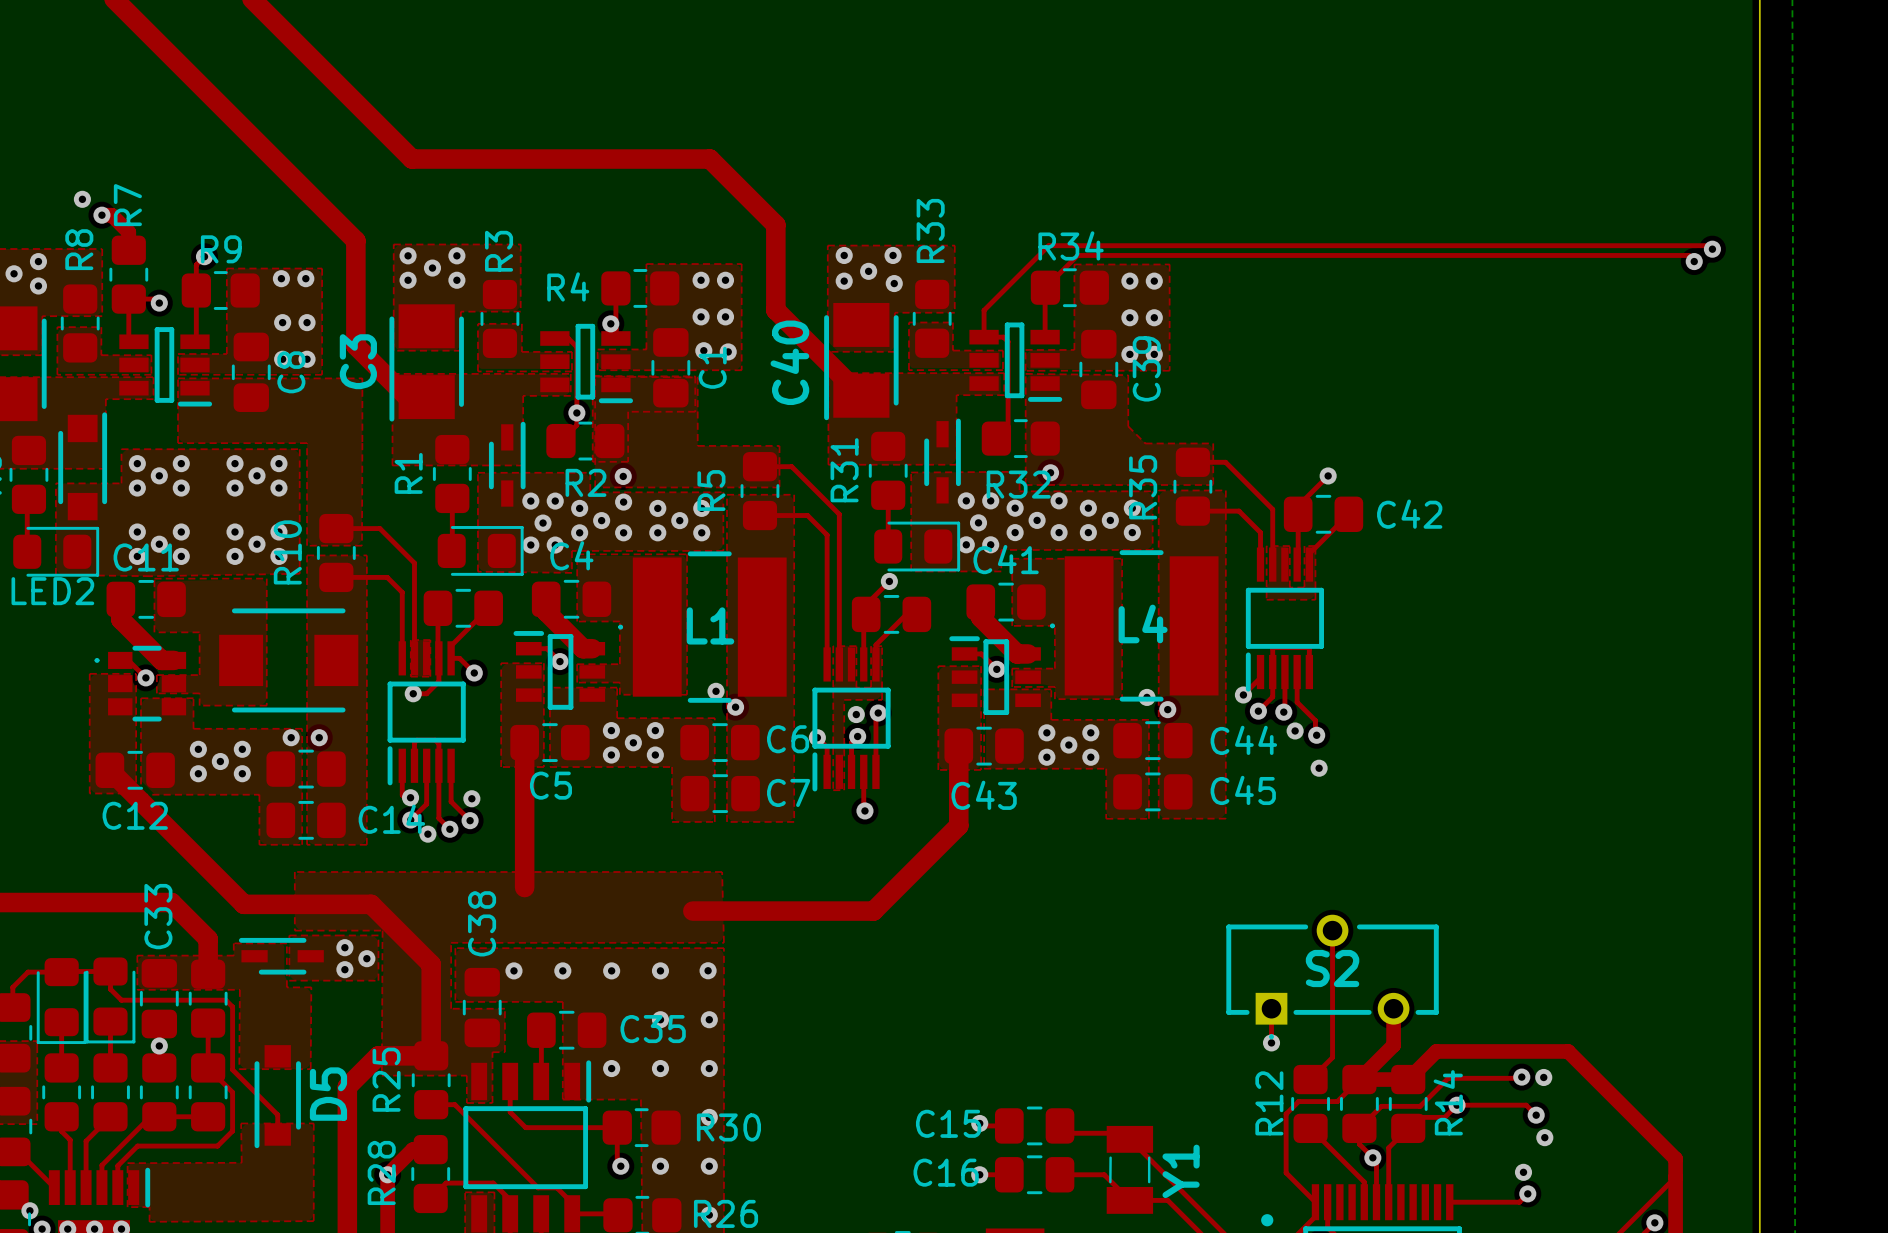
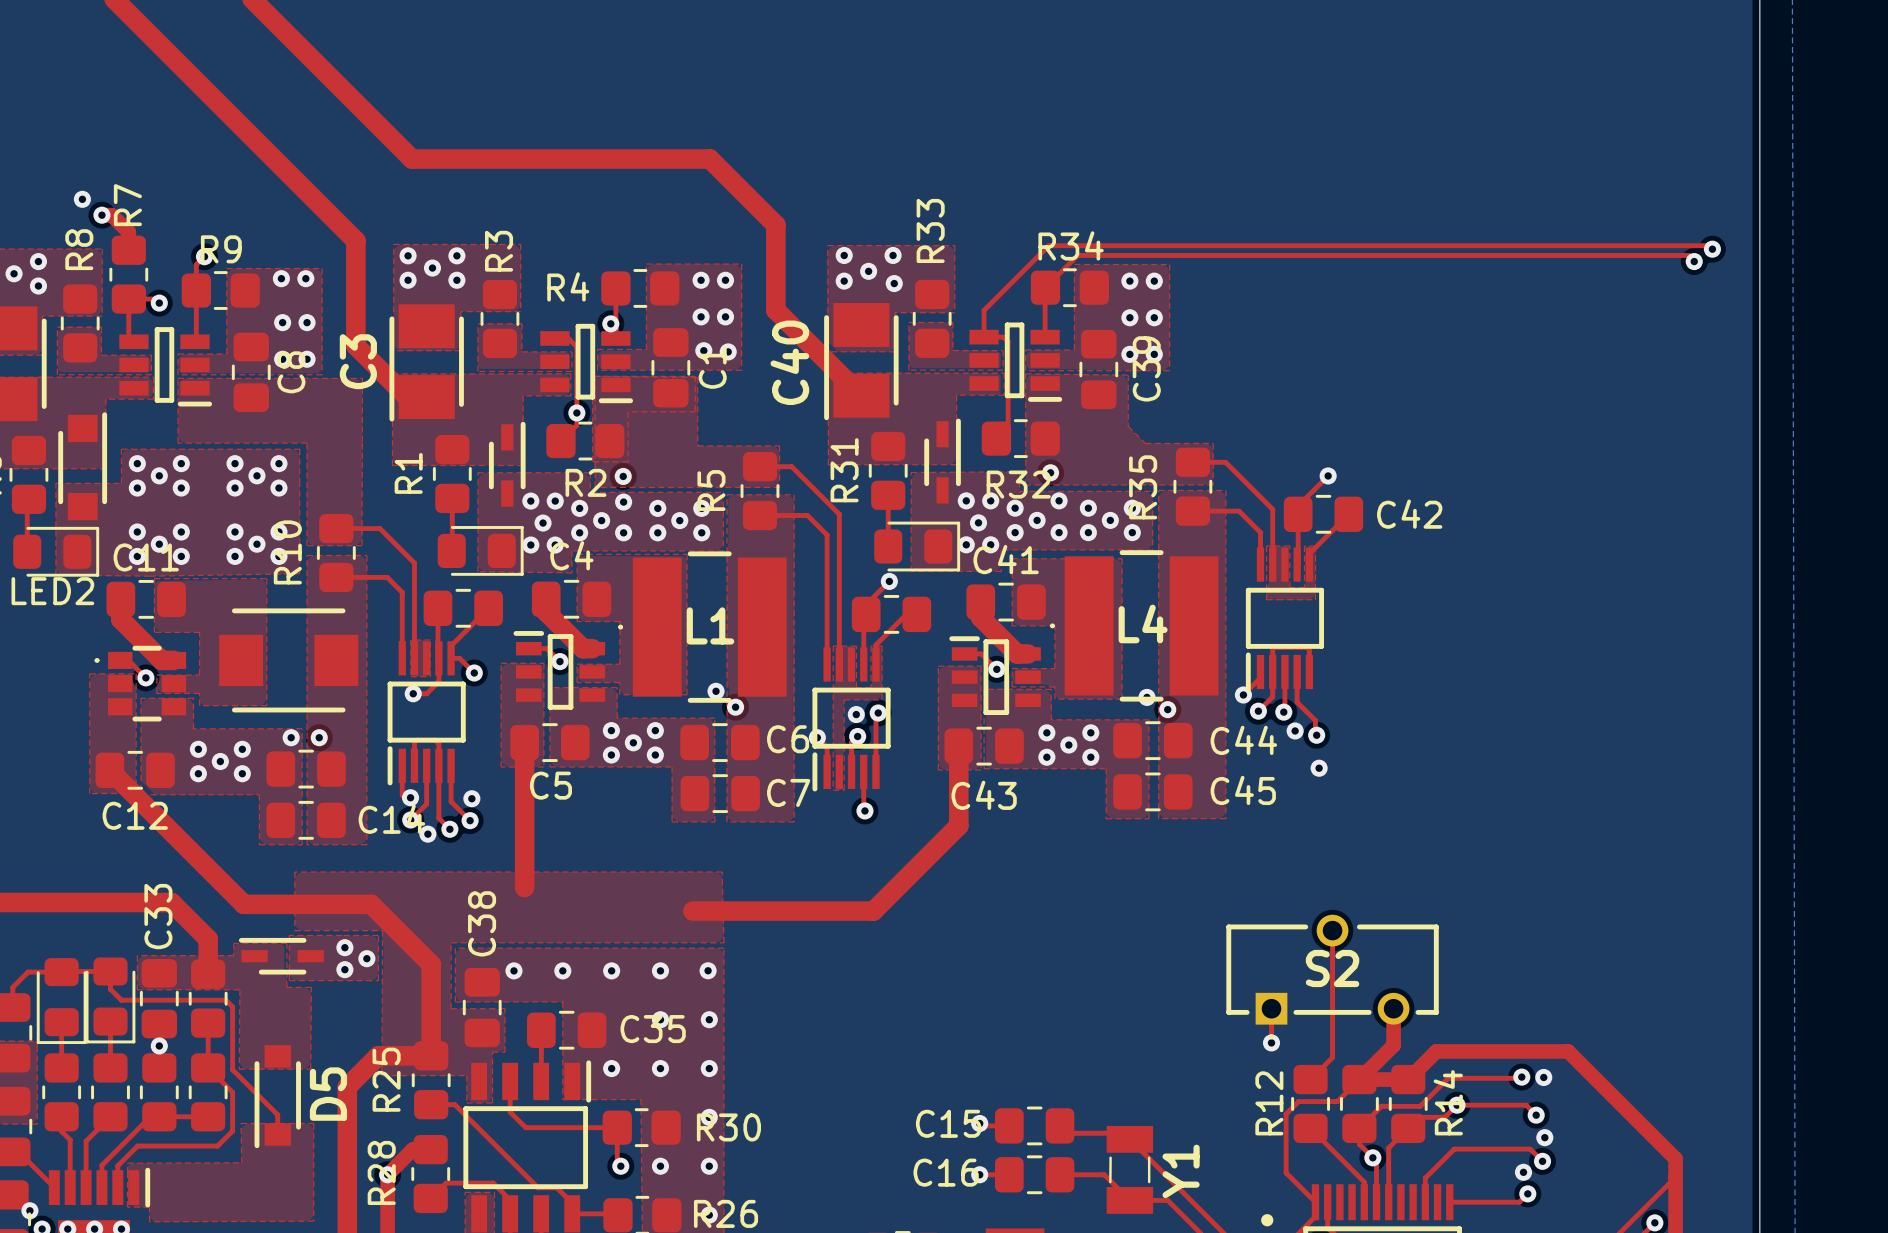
top track: none -> (1542, 1161) (1530, 1149) (1454, 1149) (1425, 1178) (1425, 1202)
via: none -> (1542, 1161)

